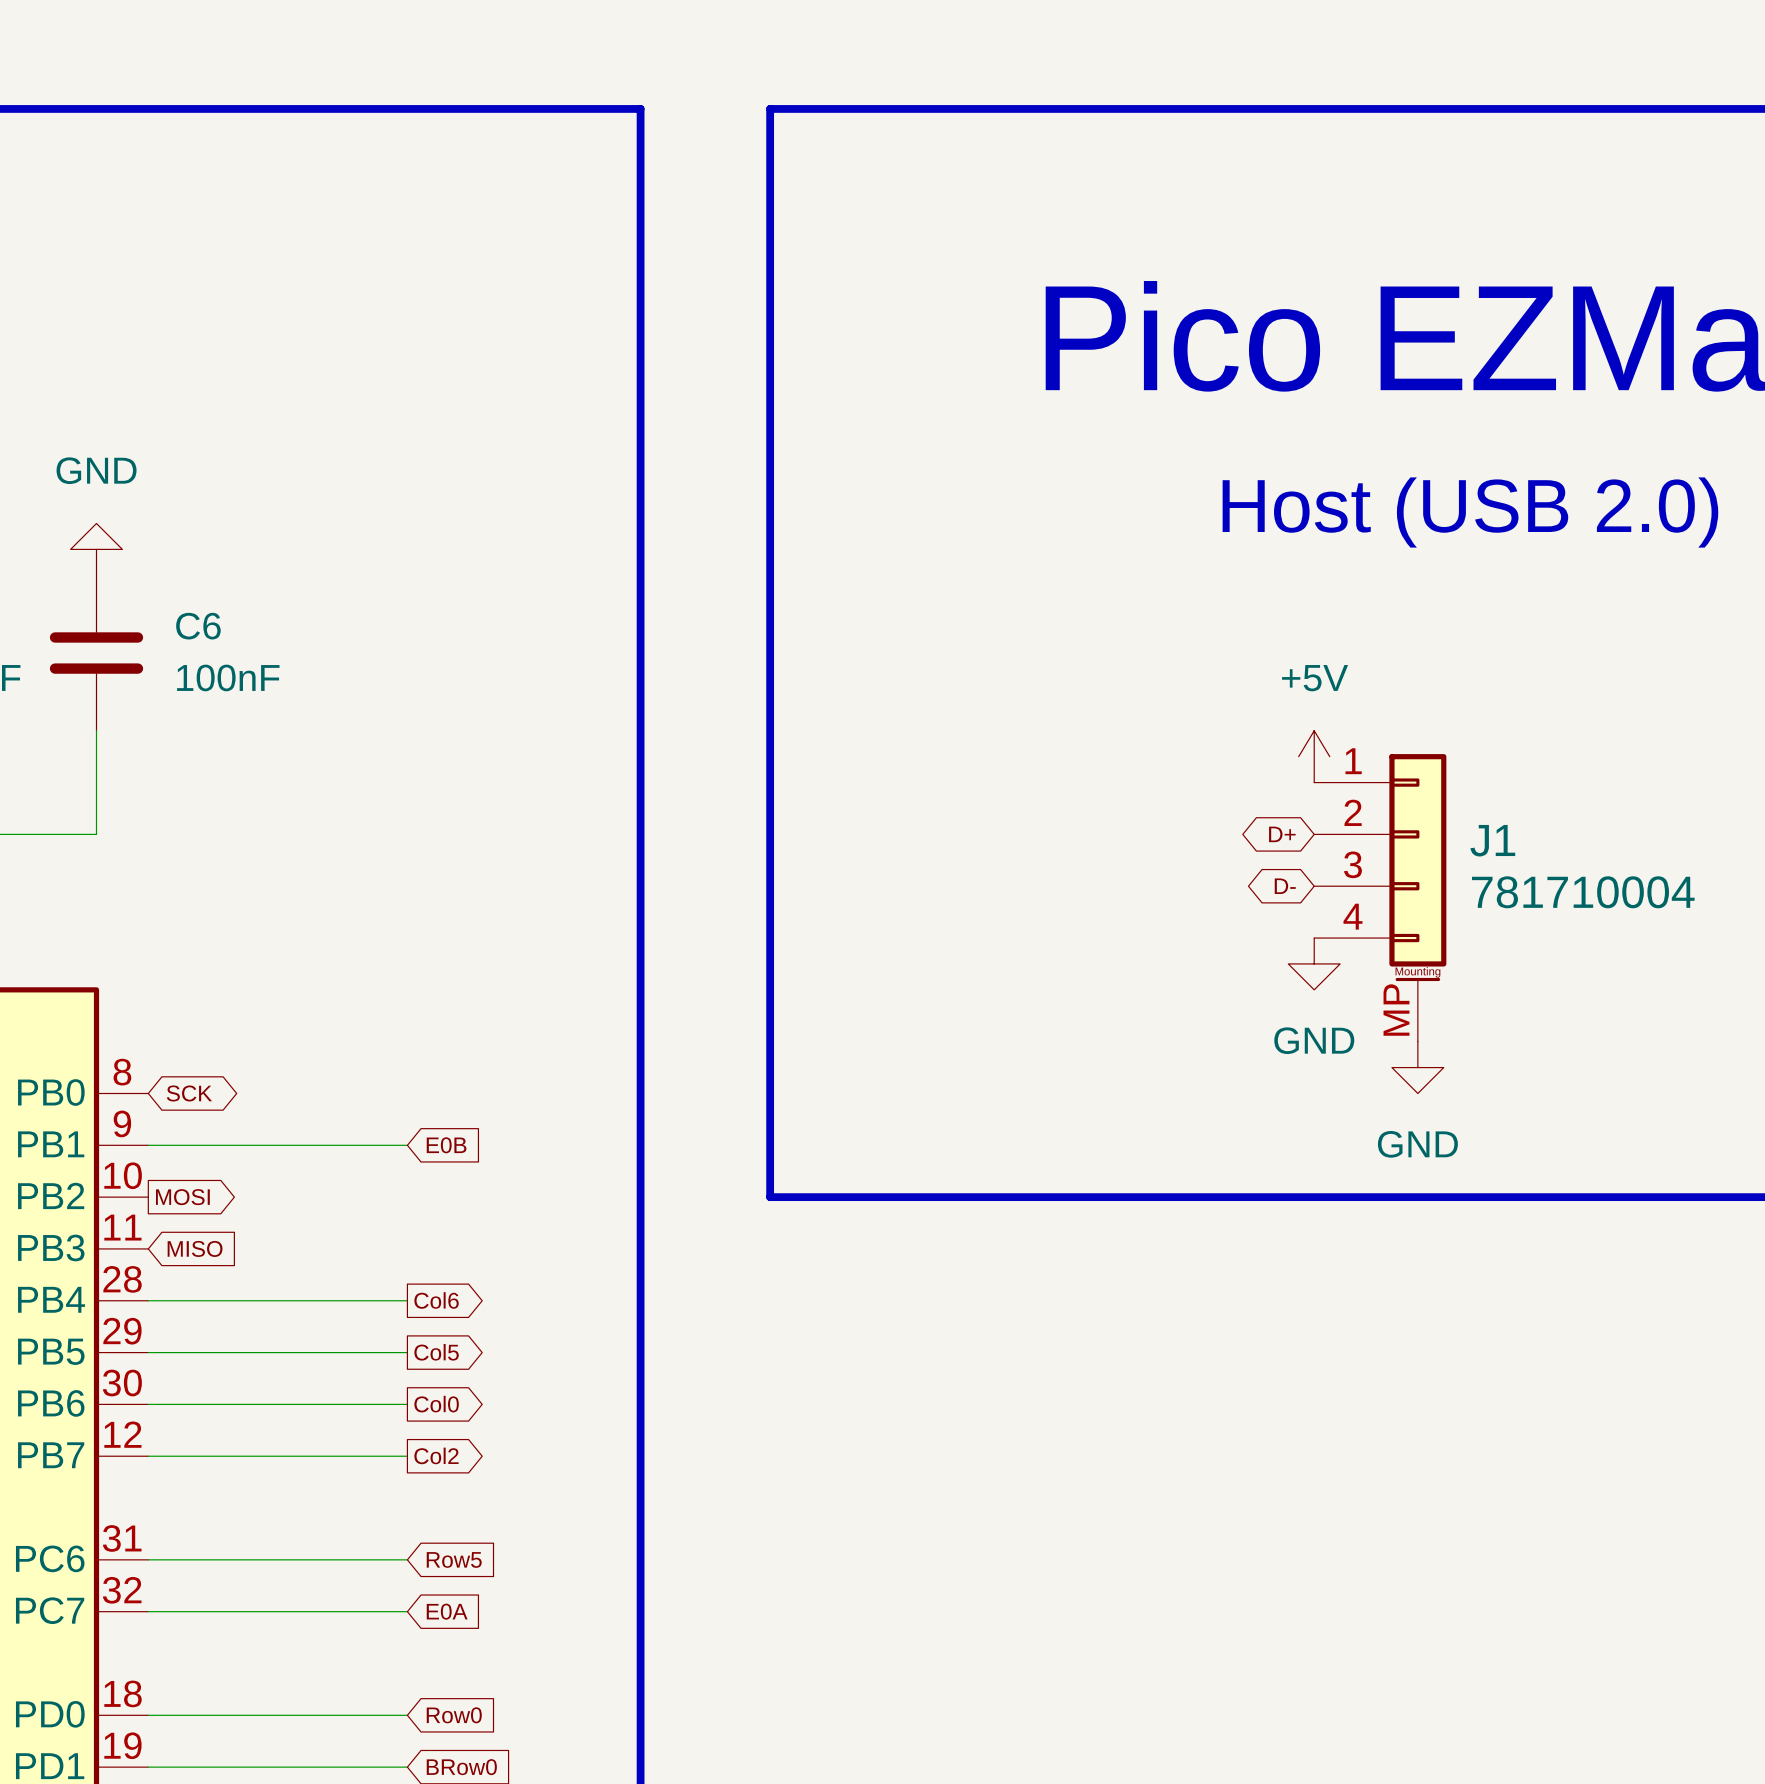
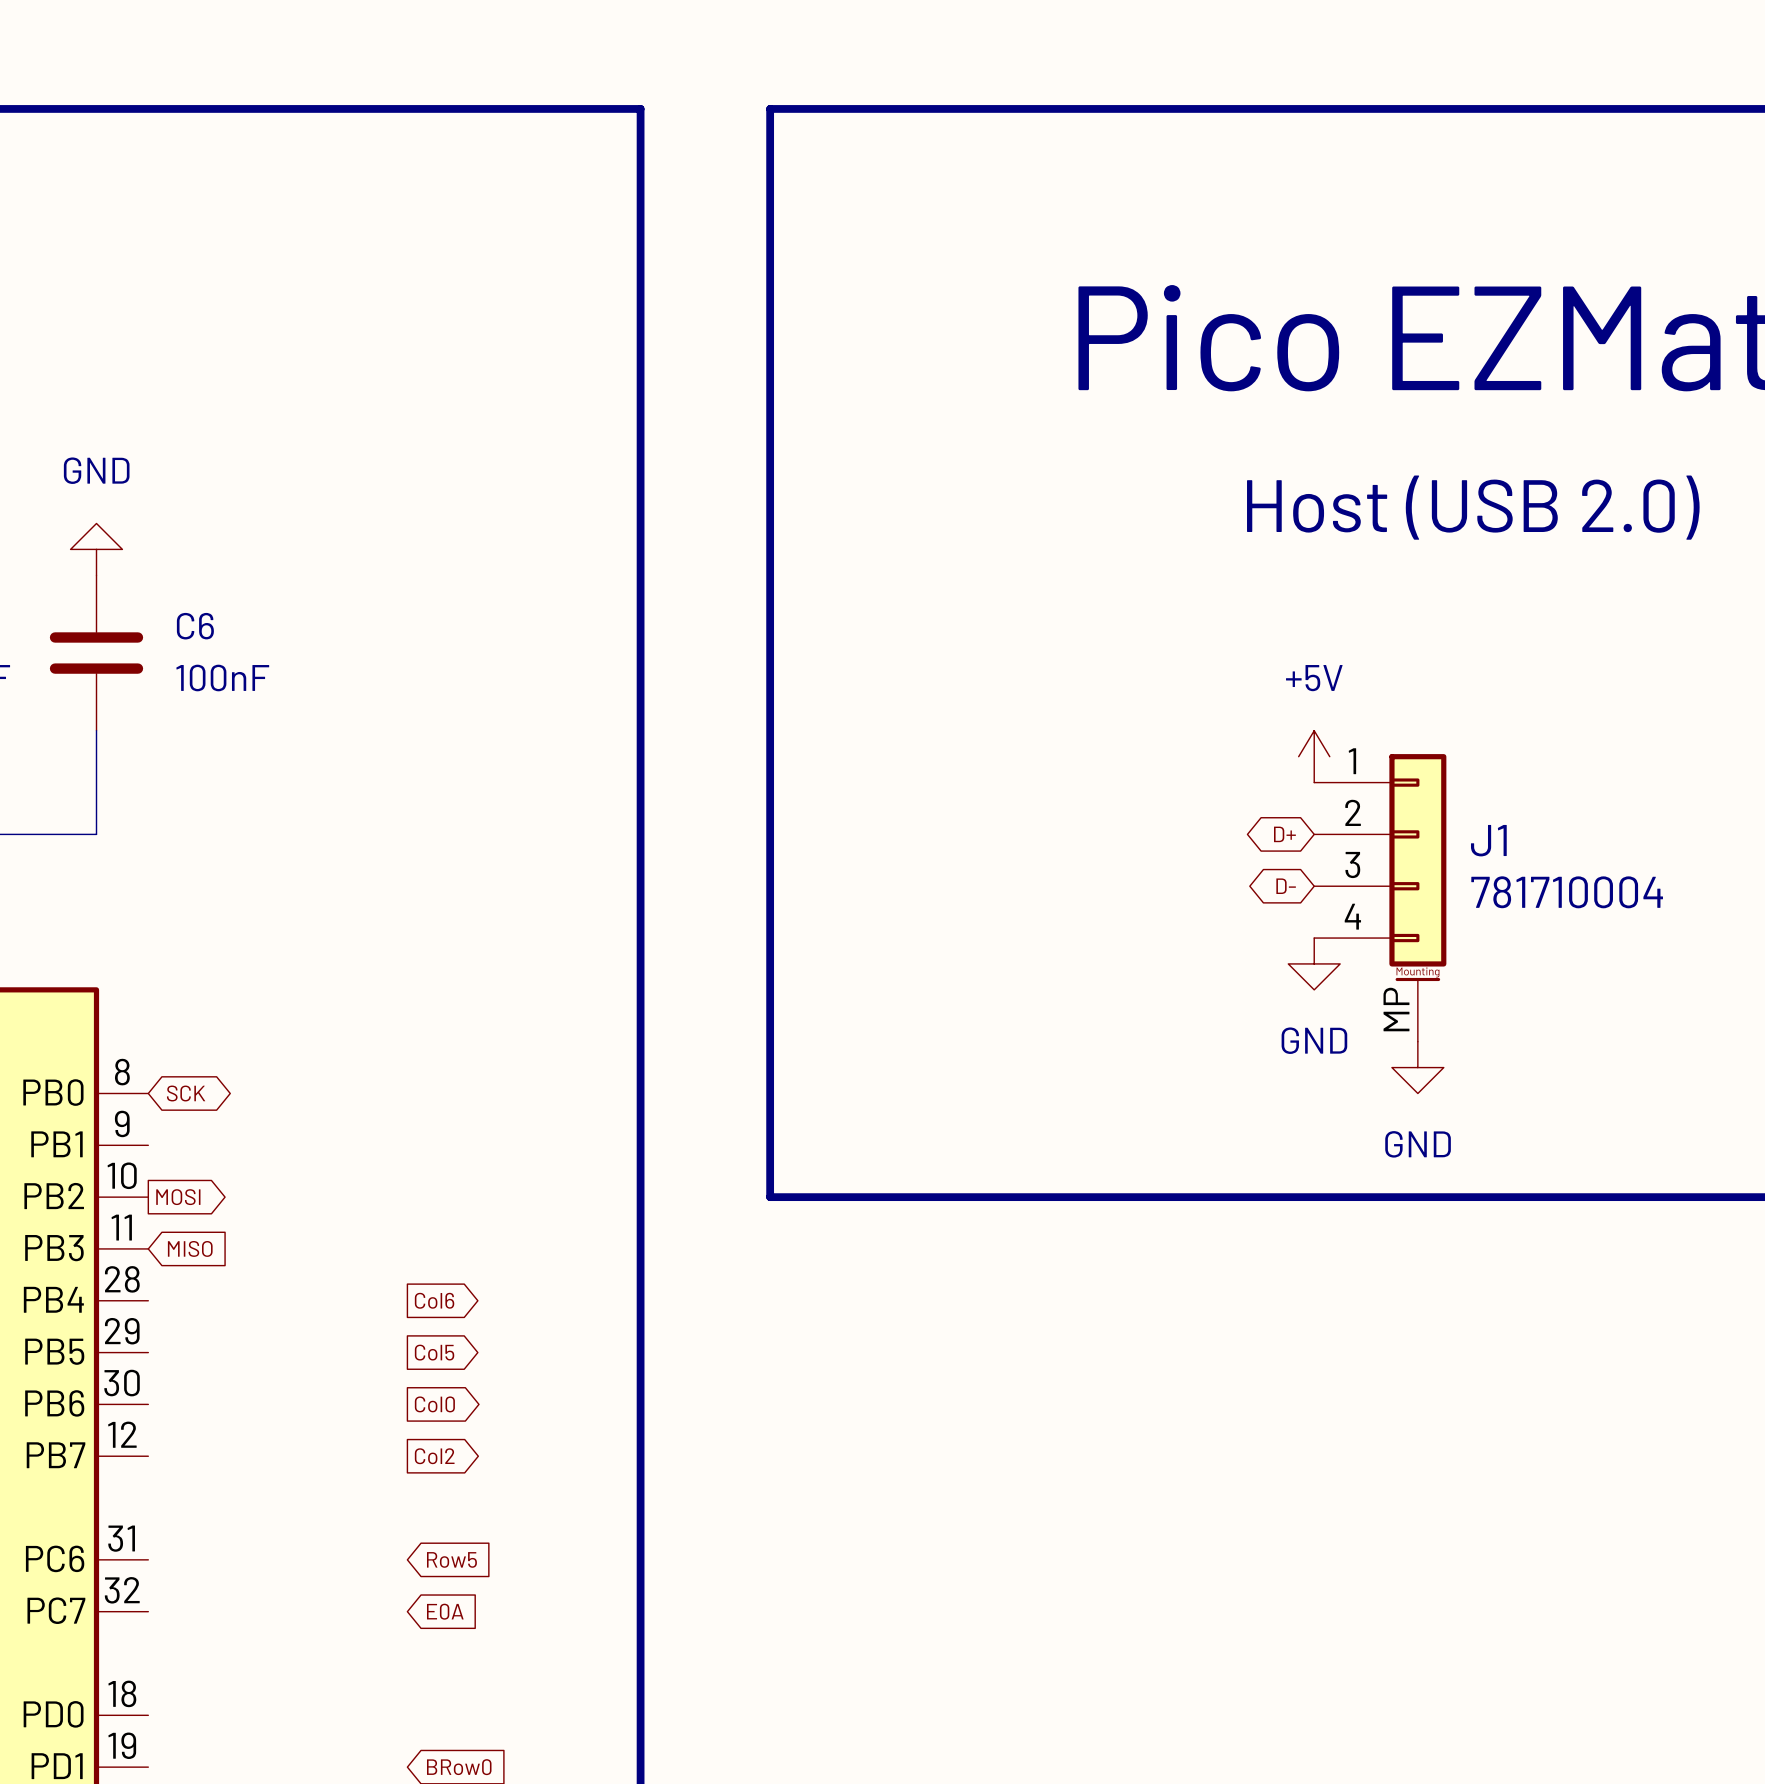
wire: (148, 1145) (407, 1145) -> none
global label: E0B (446, 1145) -> none
wire: (148, 1300) (407, 1300) -> none
wire: (148, 1352) (407, 1352) -> none
wire: (148, 1404) (407, 1404) -> none
wire: (148, 1456) (407, 1456) -> none
wire: (148, 1559) (407, 1559) -> none
wire: (148, 1611) (407, 1611) -> none
wire: (148, 1715) (407, 1715) -> none
global label: Row0 (454, 1715) -> none
wire: (148, 1767) (407, 1767) -> none

